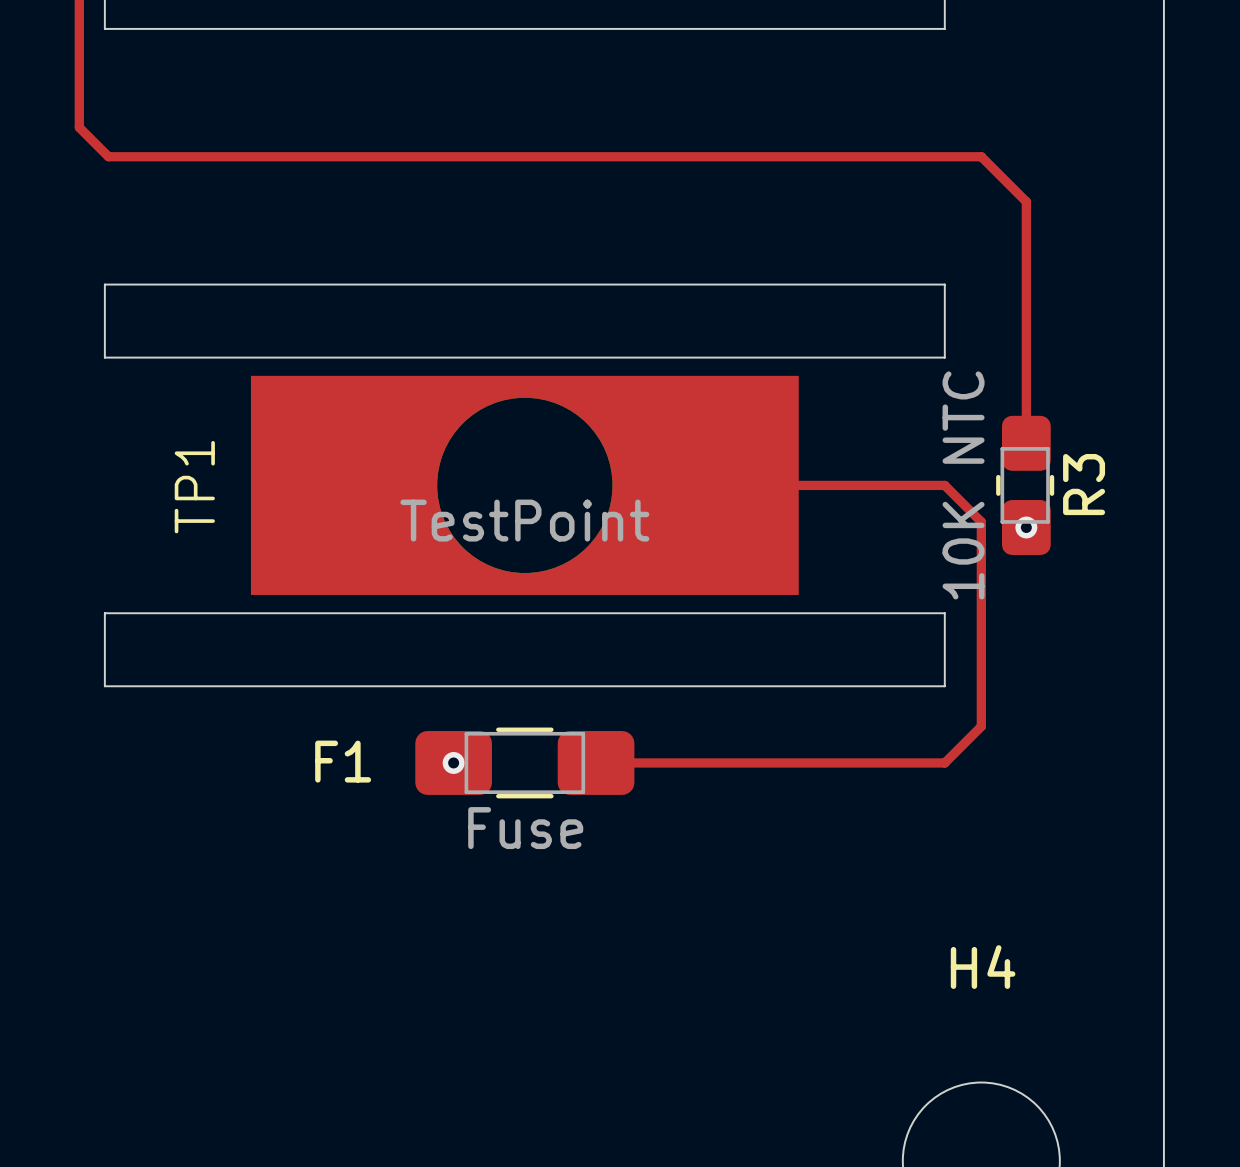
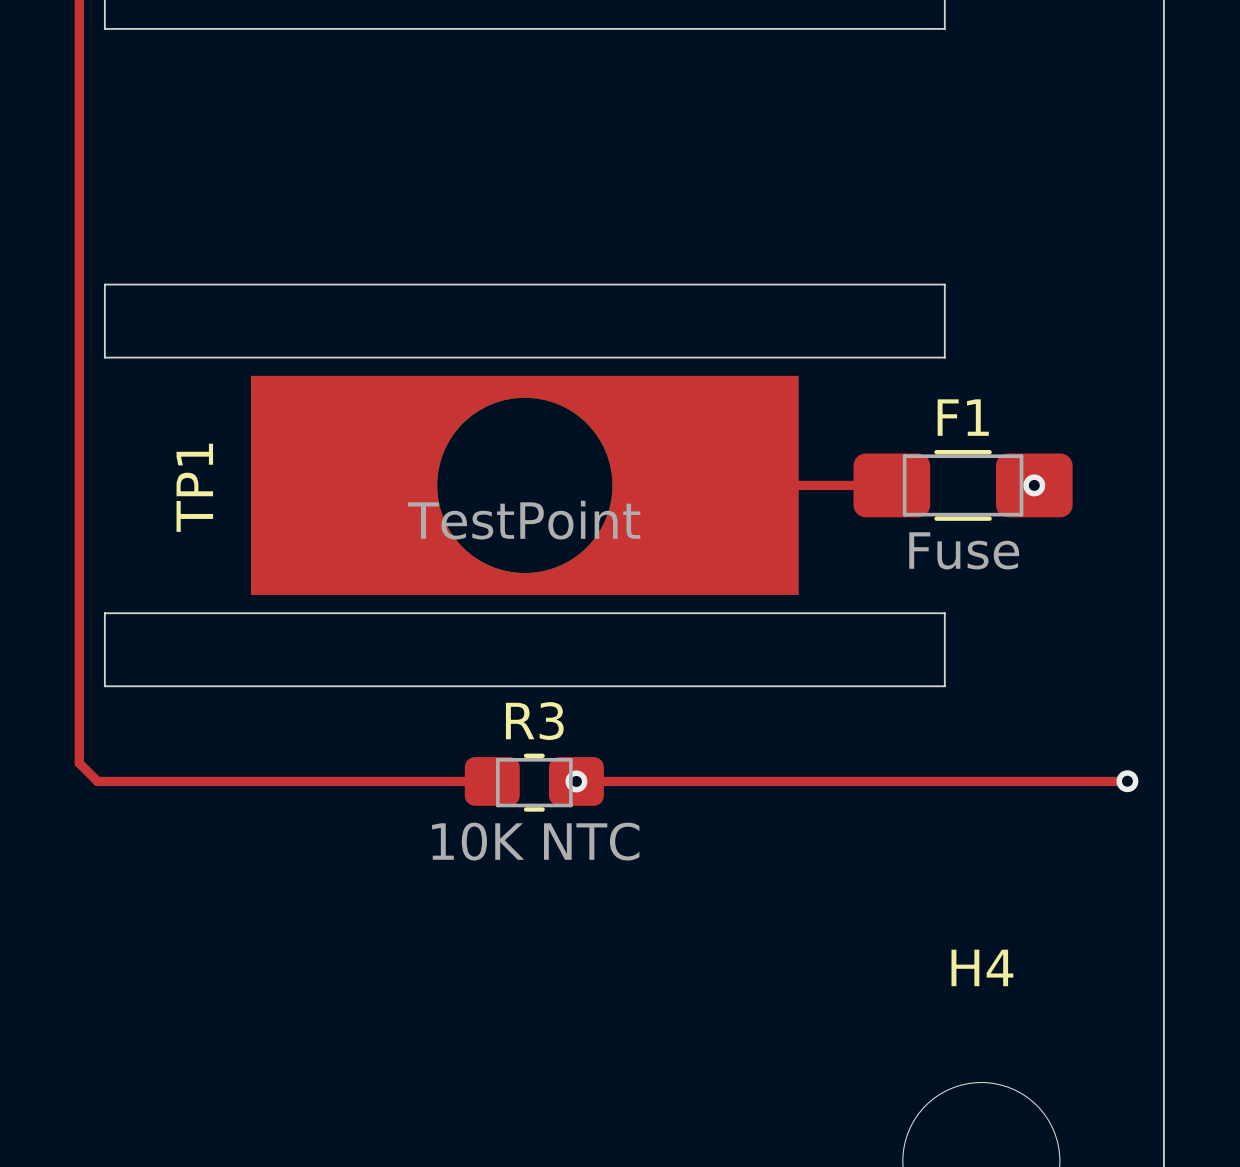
track: (79, 127) (108, 156) (981, 156) (1026, 201) (1026, 443) -> (79, 127) (79, 763) (97, 781) (492, 781)
track: (891, 485) (944, 485) (981, 521) (981, 726) (944, 762) (596, 762) -> none
R3 rotation: 0° (1025, 485) -> 90° counterclockwise (534, 782)
R3 position: (1025, 485) -> (534, 782)
via position: (1026, 527) -> (1034, 485)
F1 name position: F1 (343, 761) -> F1 (963, 417)
via position: (453, 762) -> (576, 781)
F1 position: (524, 762) -> (963, 485)
track: none -> (576, 781) (1127, 781)
via: none -> (1127, 781)

